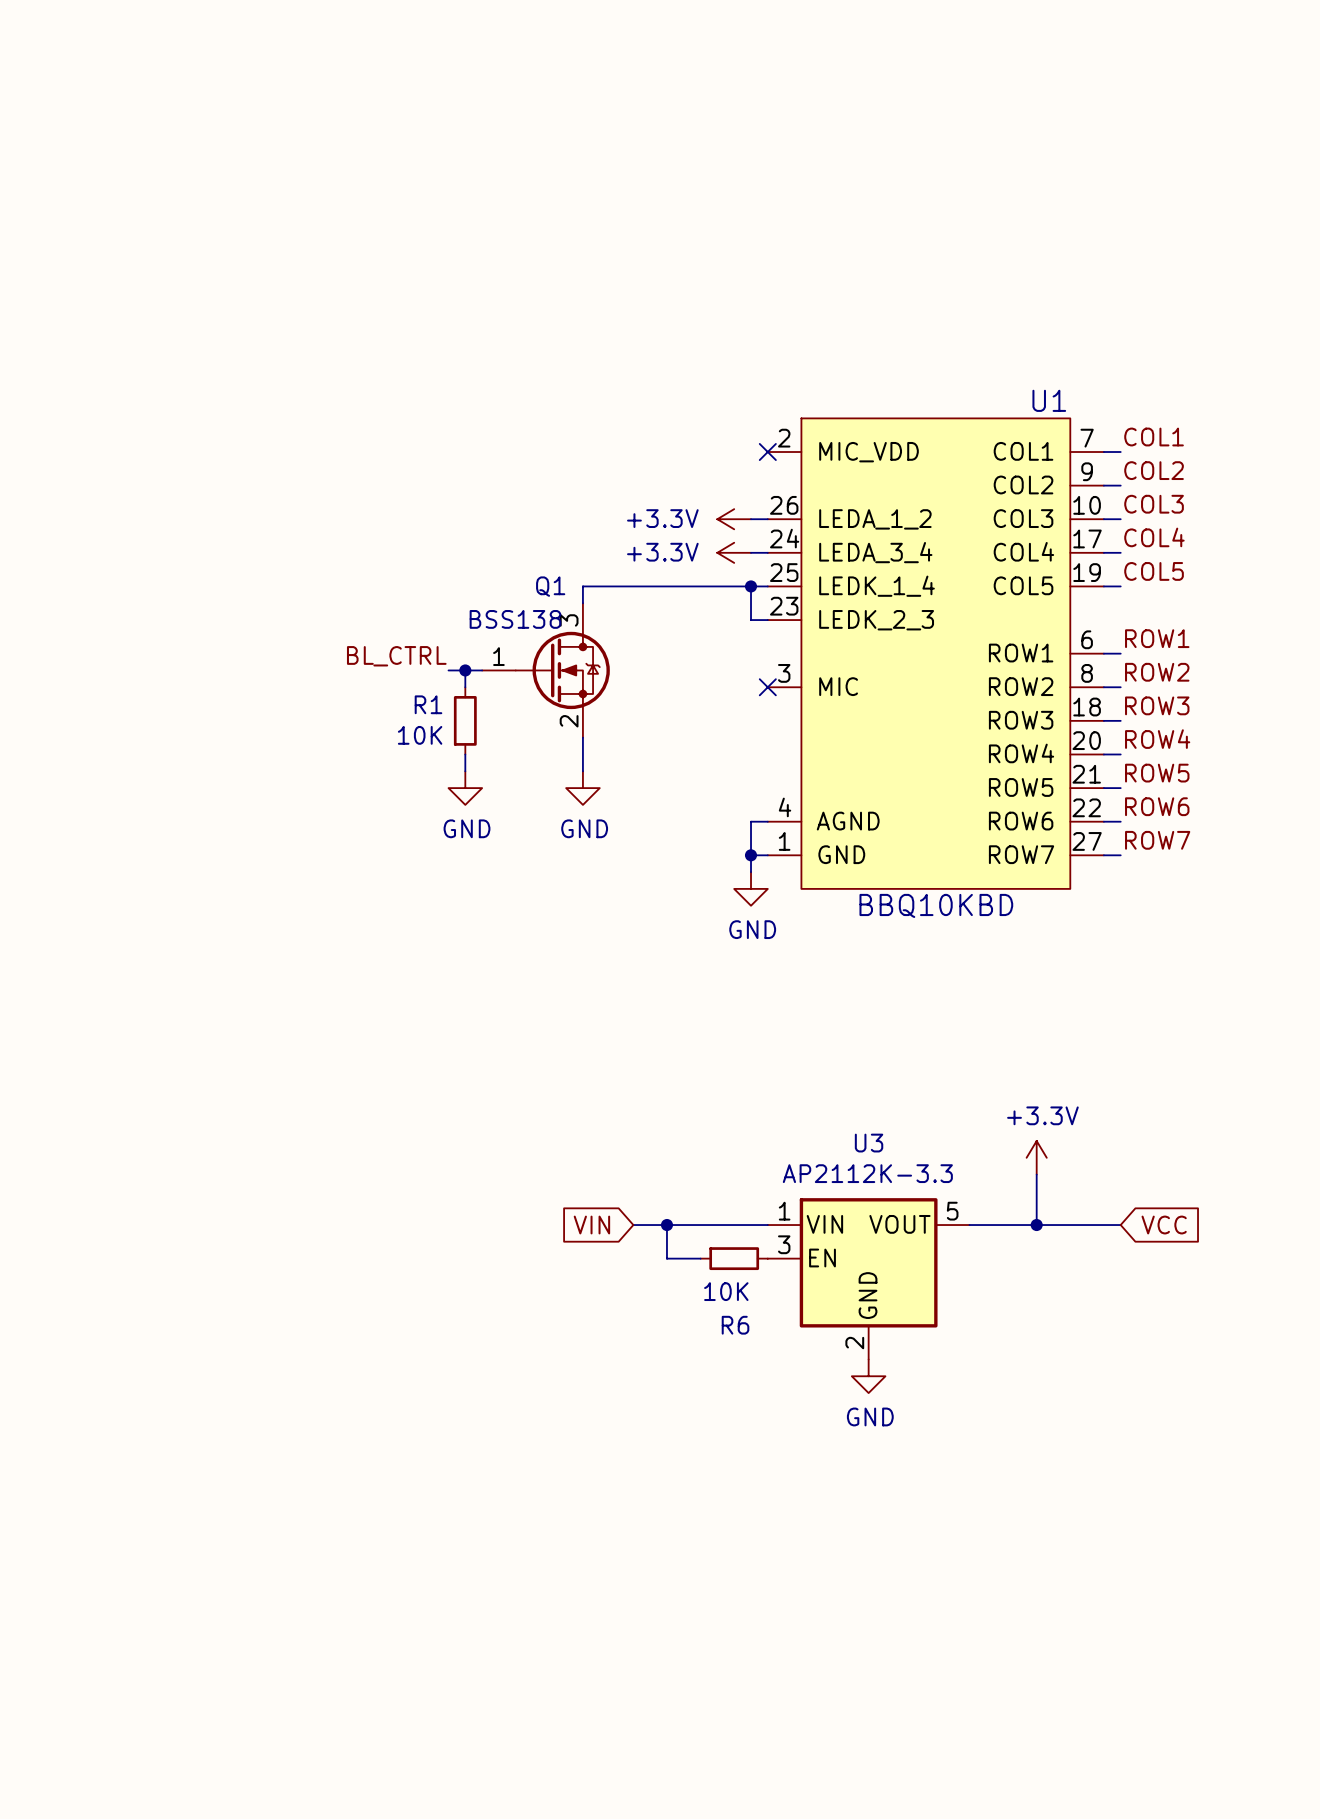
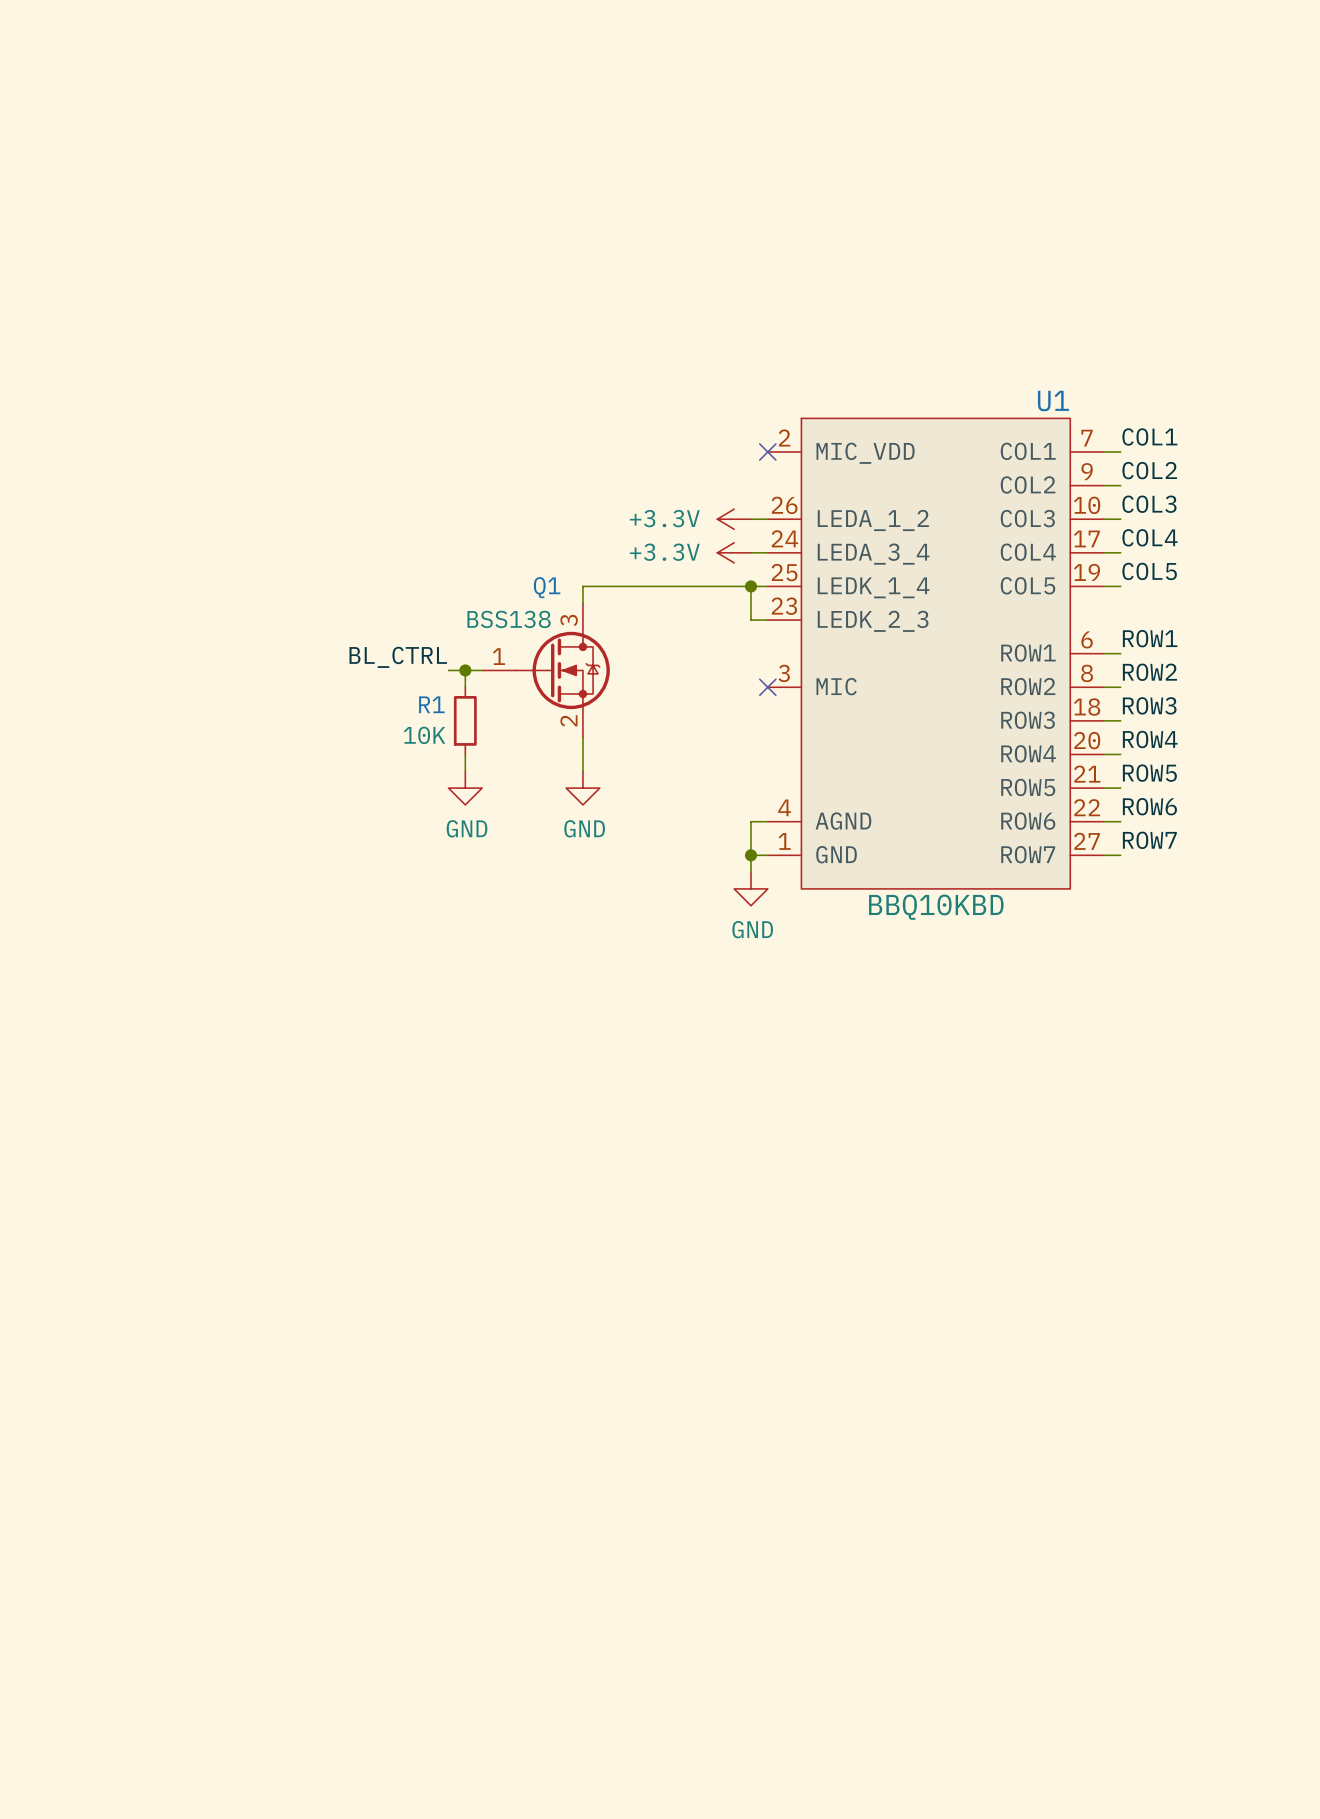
power symbol: +3.3V (1036, 1157) -> none
wire: (1036, 1174) (1036, 1225) -> none
global label: VIN (591, 1225) -> none
wire: (633, 1225) (767, 1225) -> none
wire: (666, 1225) (666, 1258) (700, 1258) -> none
junction: (666, 1225) -> none
wire: (969, 1225) (1120, 1225) -> none
junction: (1036, 1225) -> none
global label: VCC (1164, 1225) -> none
R6: 10K (734, 1258) -> none
U3: AP2112K-3.3 (868, 1278) -> none
power symbol: GND (868, 1376) -> none

